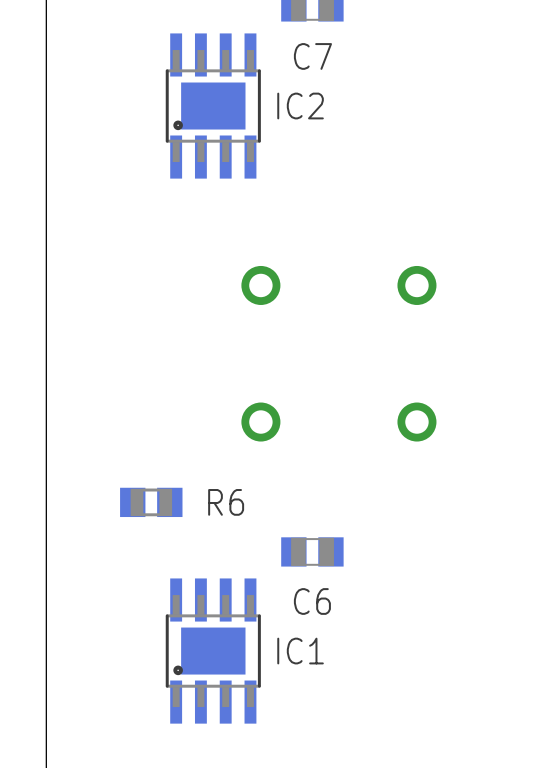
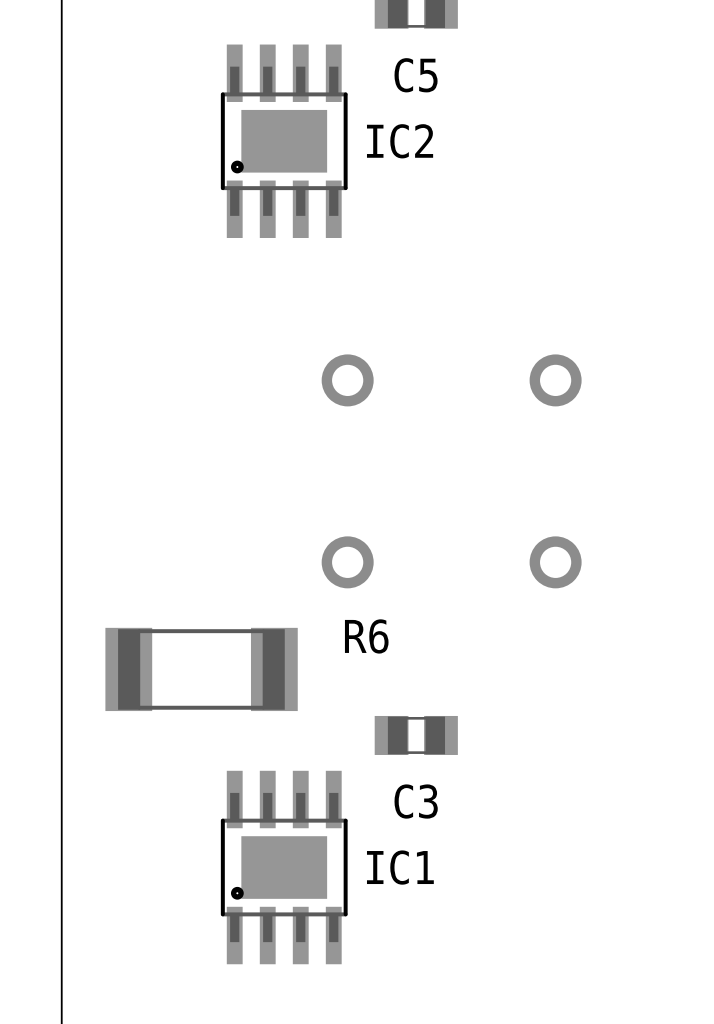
C7 name: C7 (312, 56) -> C5 (416, 75)
R6 footprint: [120, 487, 183, 518] -> [105, 627, 298, 712]
R6 name position: R6 (226, 502) -> R6 (366, 636)
C6 name: C6 (312, 601) -> C3 (416, 801)

